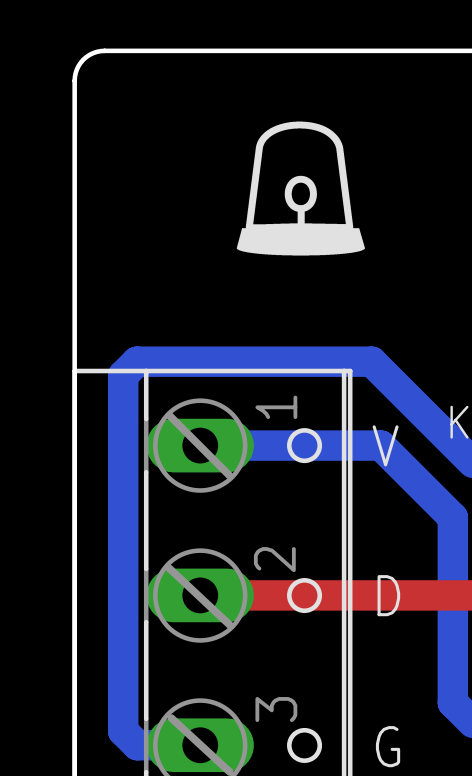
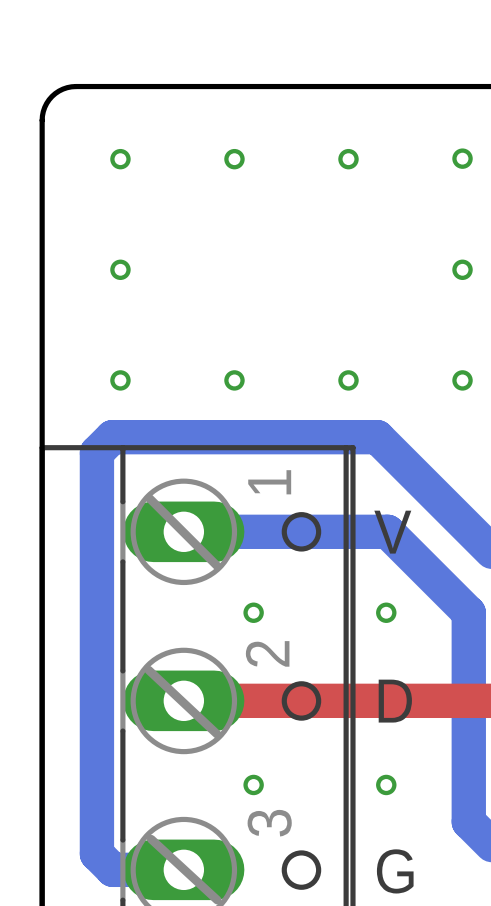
via: none -> (462, 158)
via: none -> (120, 159)
via: none -> (234, 159)
via: none -> (348, 159)
drawing: [236, 121, 365, 256] -> none
via: none -> (120, 269)
via: none -> (462, 269)
via: none -> (120, 380)
via: none -> (234, 380)
via: none -> (348, 380)
via: none -> (462, 380)
via: none -> (253, 612)
via: none -> (386, 612)
via: none -> (253, 784)
via: none -> (386, 784)

